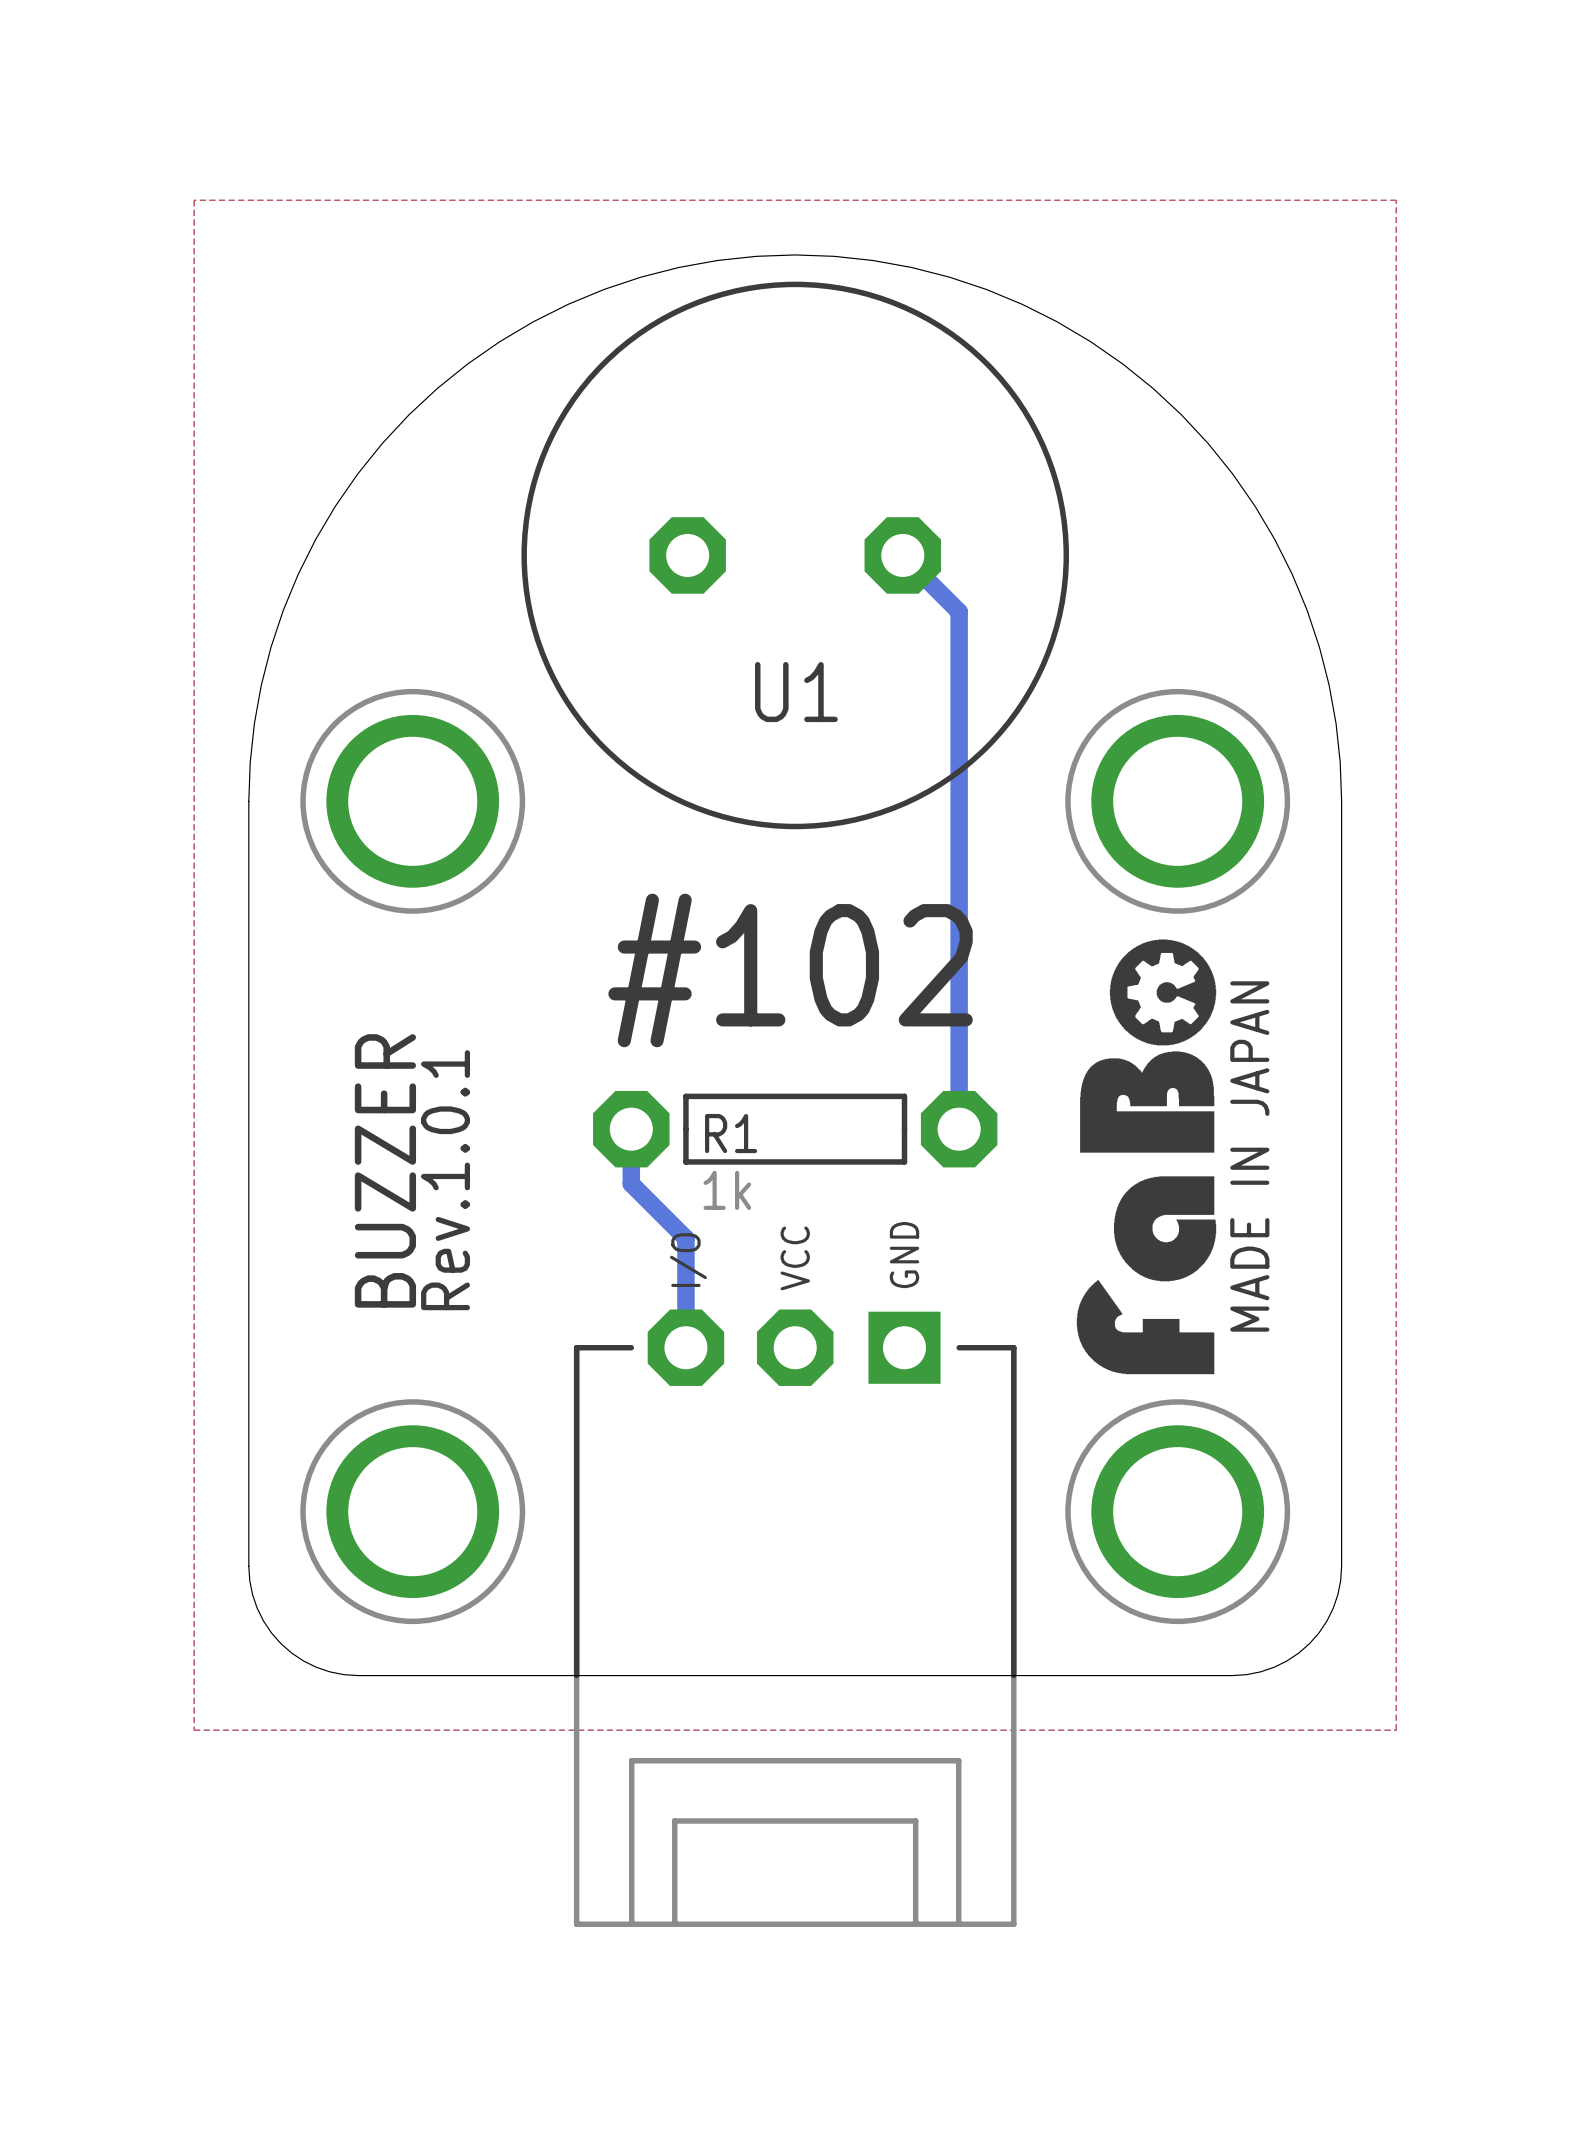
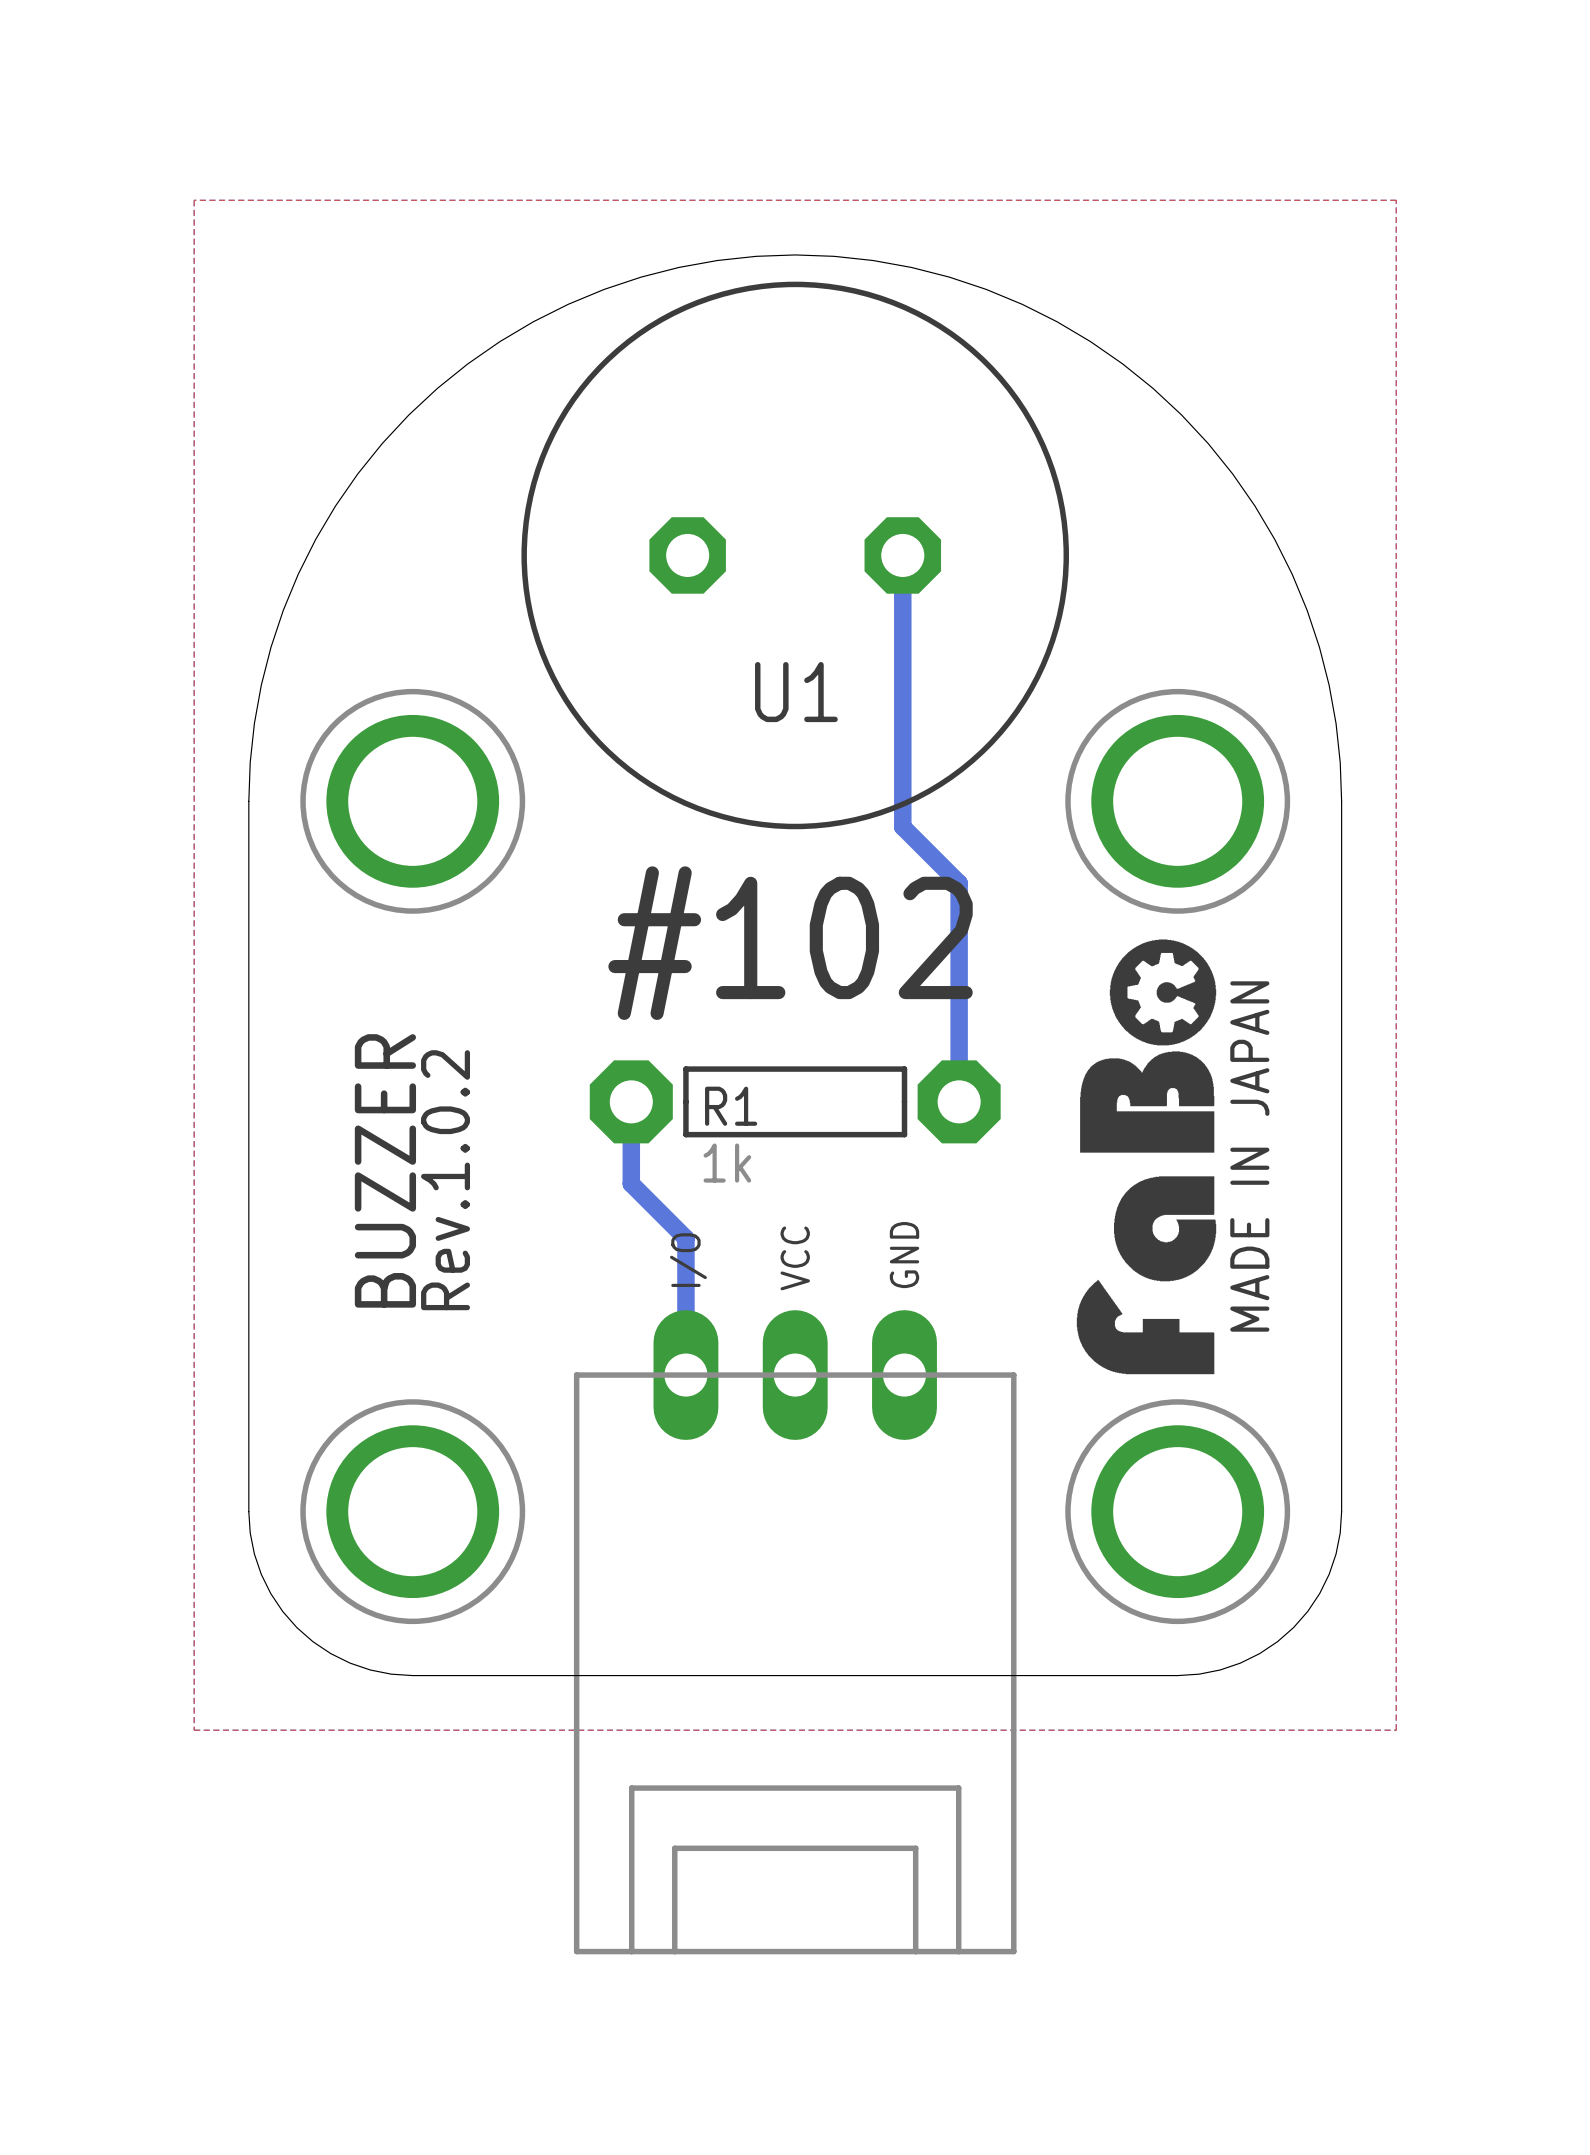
part footprint: [248, 254, 1342, 1927] -> [248, 254, 1342, 1955]
bottom track: (902, 555) (959, 611) (959, 883) -> (902, 555) (902, 826) (959, 883)
text position: #102 (790, 970) -> #102 (790, 943)
R1 footprint: [593, 1090, 998, 1168] -> [589, 1060, 1001, 1144]
R1 name position: R1 (731, 1133) -> R1 (731, 1106)
text: Rev.1.0.1 (445, 1180) -> Rev.1.0.2 (445, 1180)
R1 value position: 1k (727, 1190) -> 1k (727, 1163)

